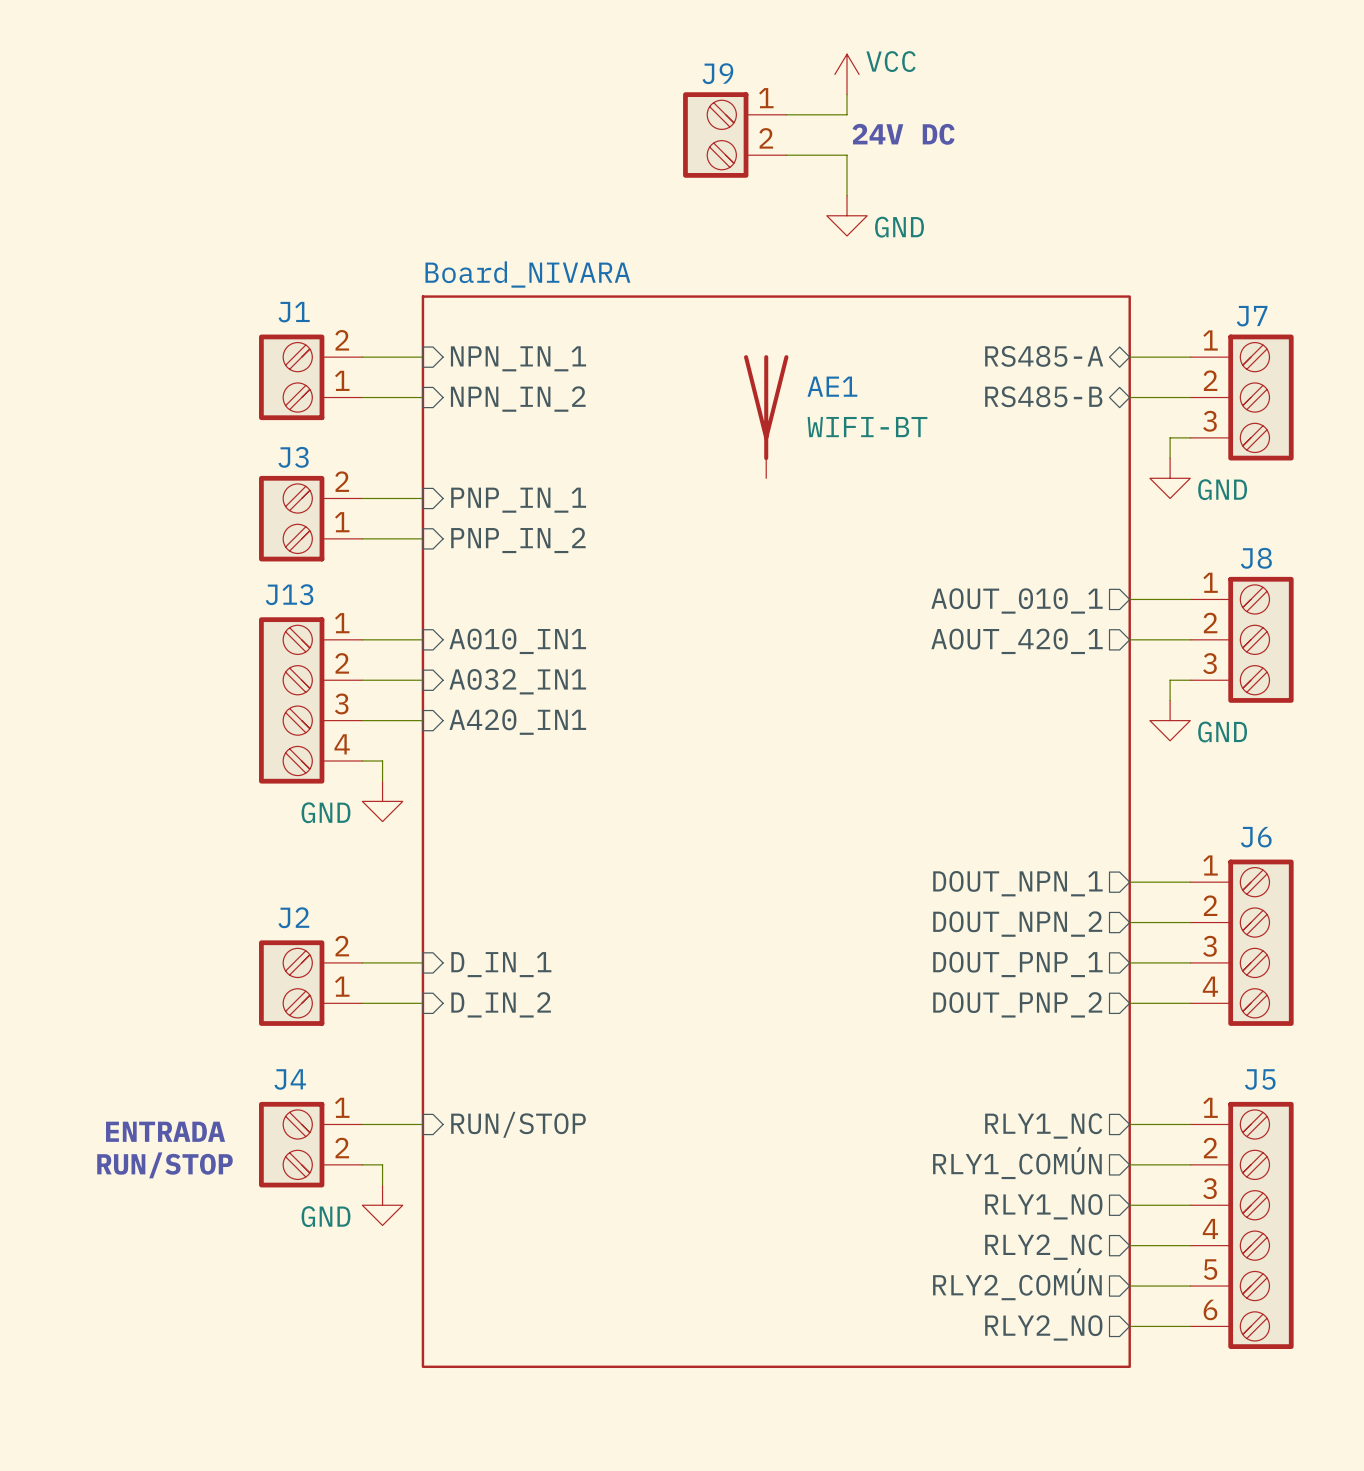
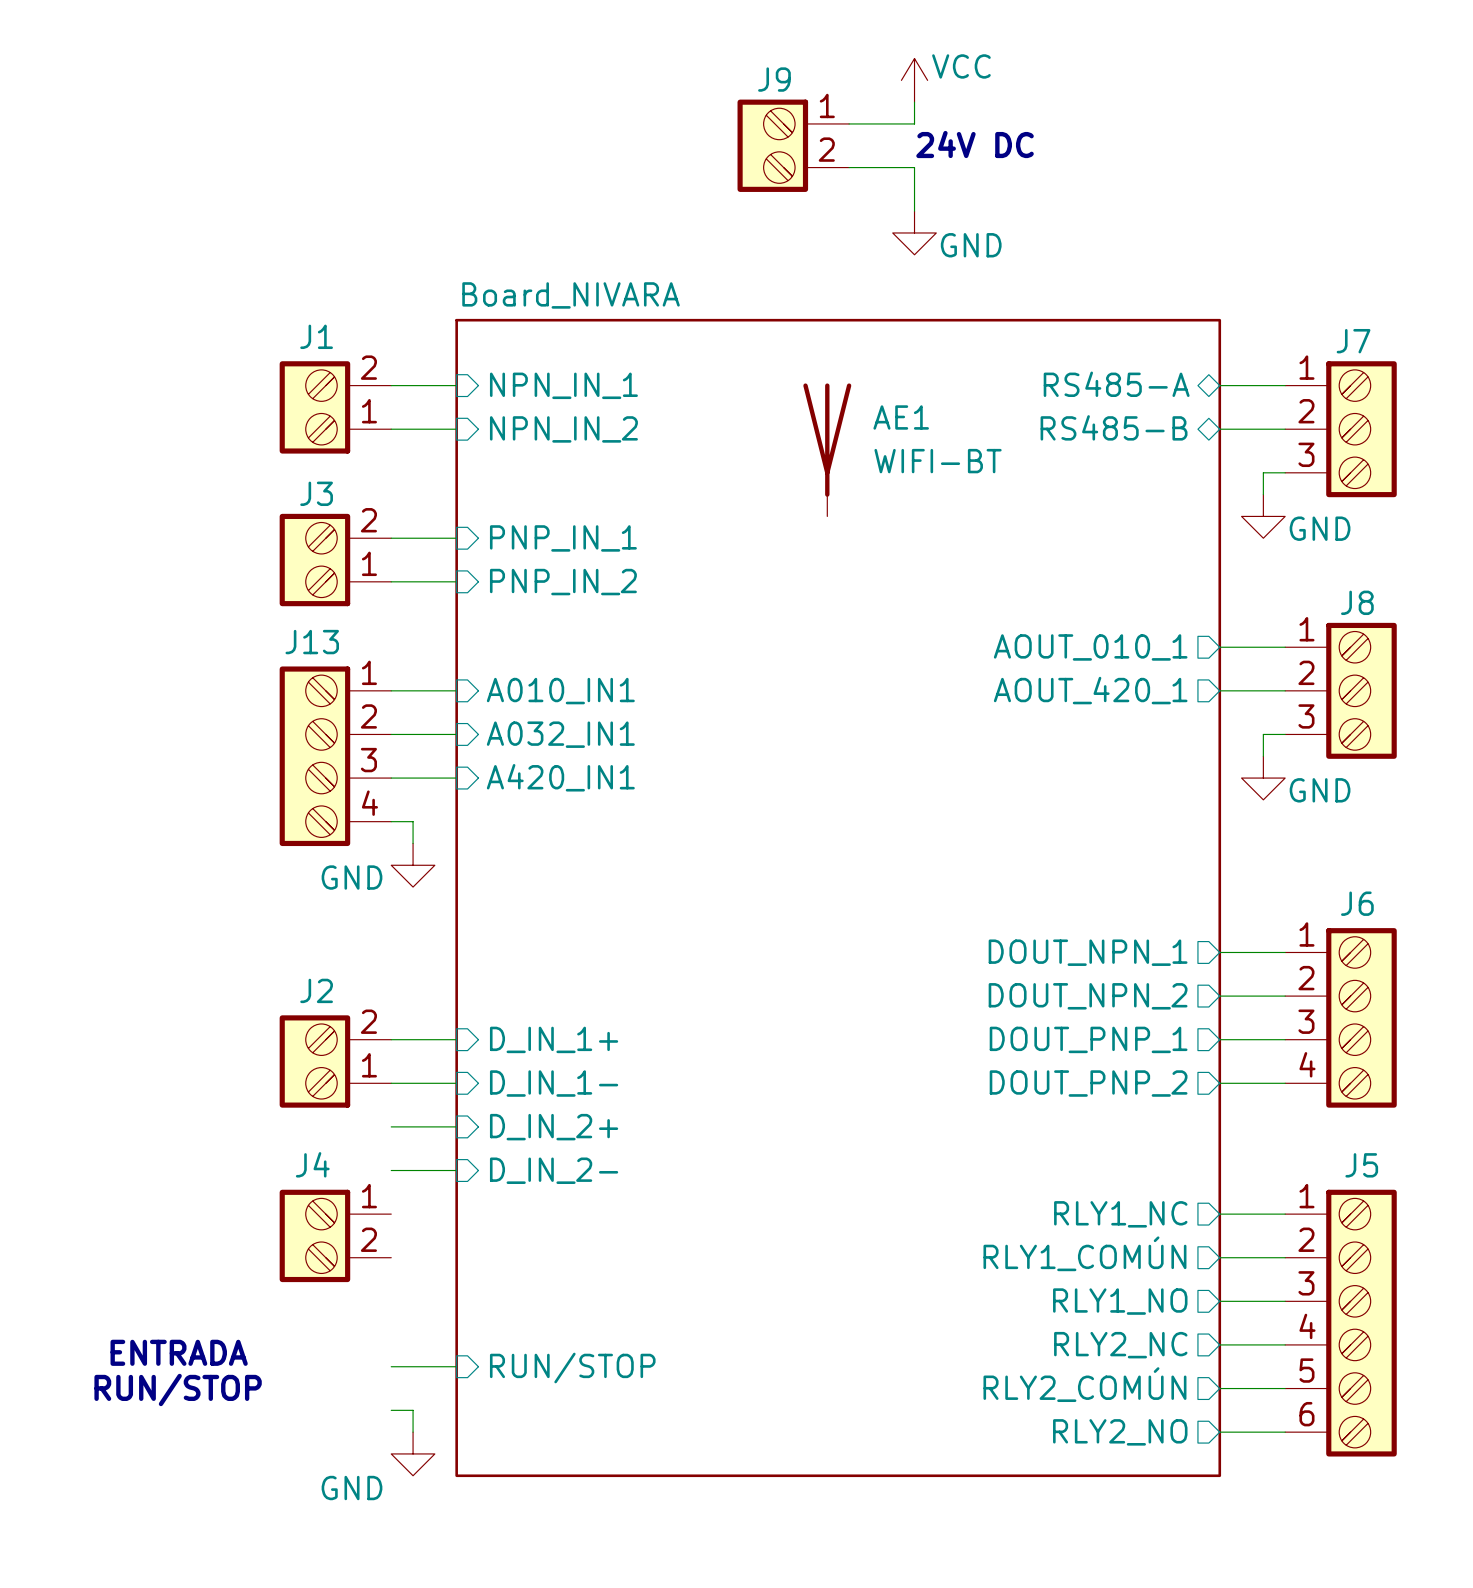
sheet pin: D_IN_1 (501, 964) -> D_IN_1+ (554, 1039)
sheet pin: D_IN_2 (501, 1004) -> D_IN_1- (554, 1083)
wire: none -> (391, 1126) (456, 1126)
sheet pin: none -> D_IN_2+ (554, 1127)
wire: none -> (391, 1170) (456, 1170)
sheet pin: none -> D_IN_2- (554, 1170)
wire: (362, 1124) (422, 1124) -> (391, 1366) (456, 1366)
sheet pin position: RUN/STOP (518, 1124) -> RUN/STOP (572, 1368)
text position: ENTRADA (165, 1131) -> ENTRADA (179, 1352)
wire: (362, 1164) (382, 1164) (382, 1185) -> (391, 1410) (413, 1410) (413, 1432)
text position: RUN/STOP (164, 1165) -> RUN/STOP (178, 1389)
power symbol position: GND (382, 1205) -> GND (413, 1453)
power symbol text position: GND (326, 1216) -> GND (352, 1488)

